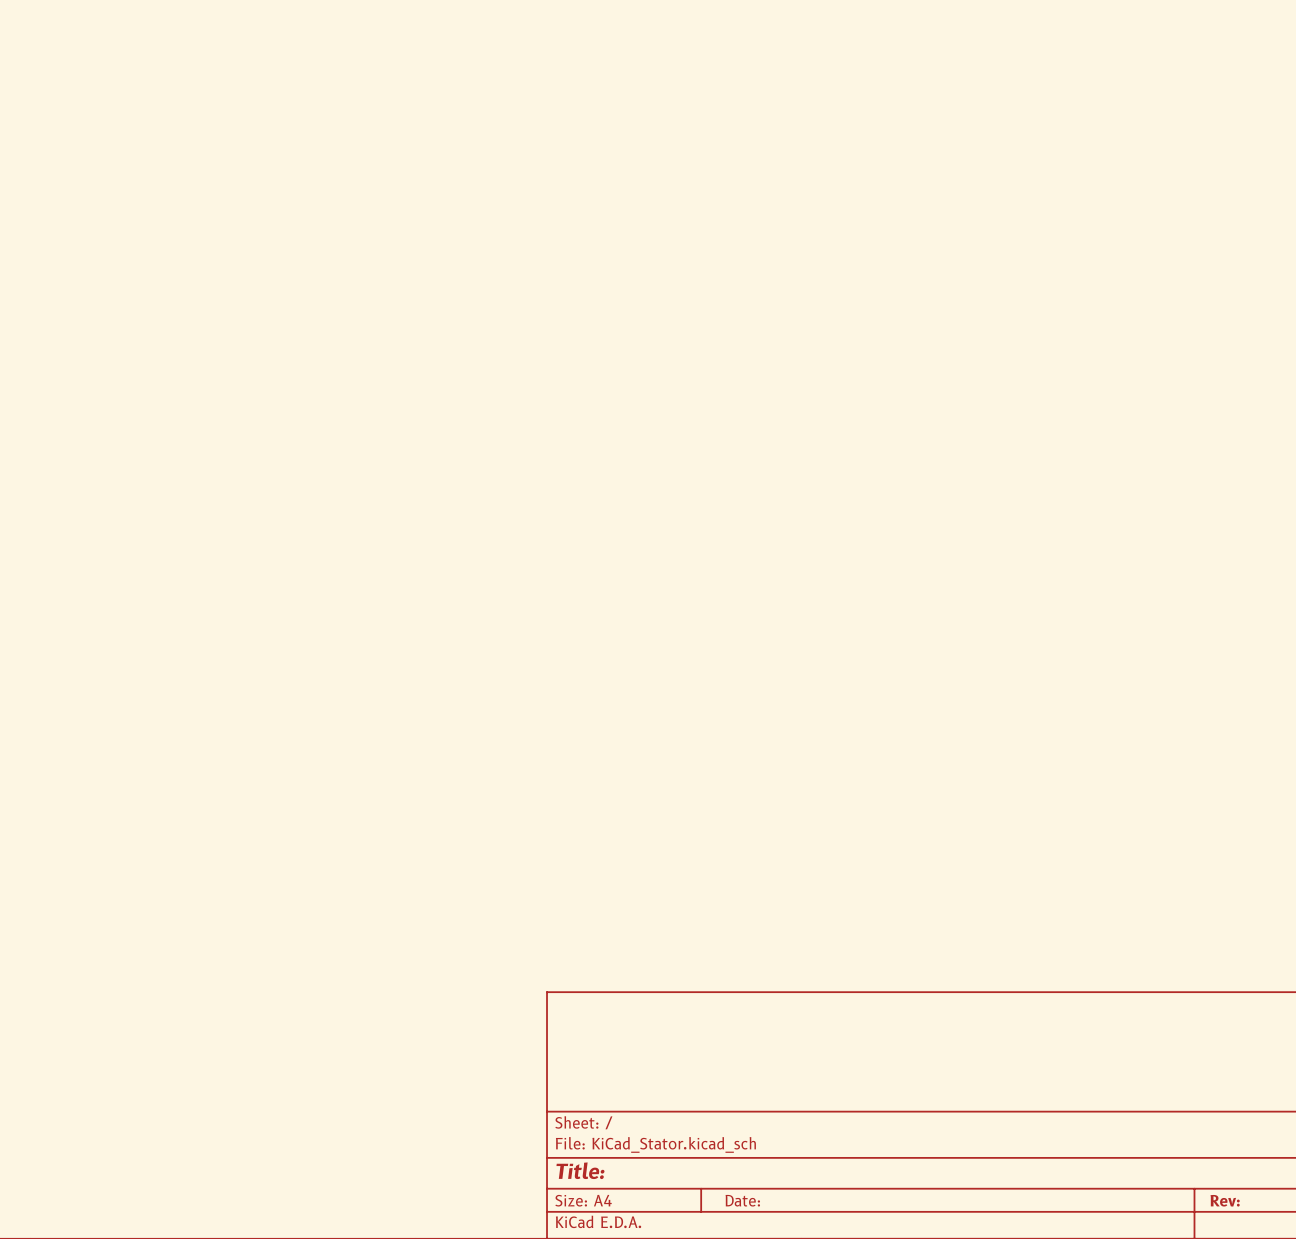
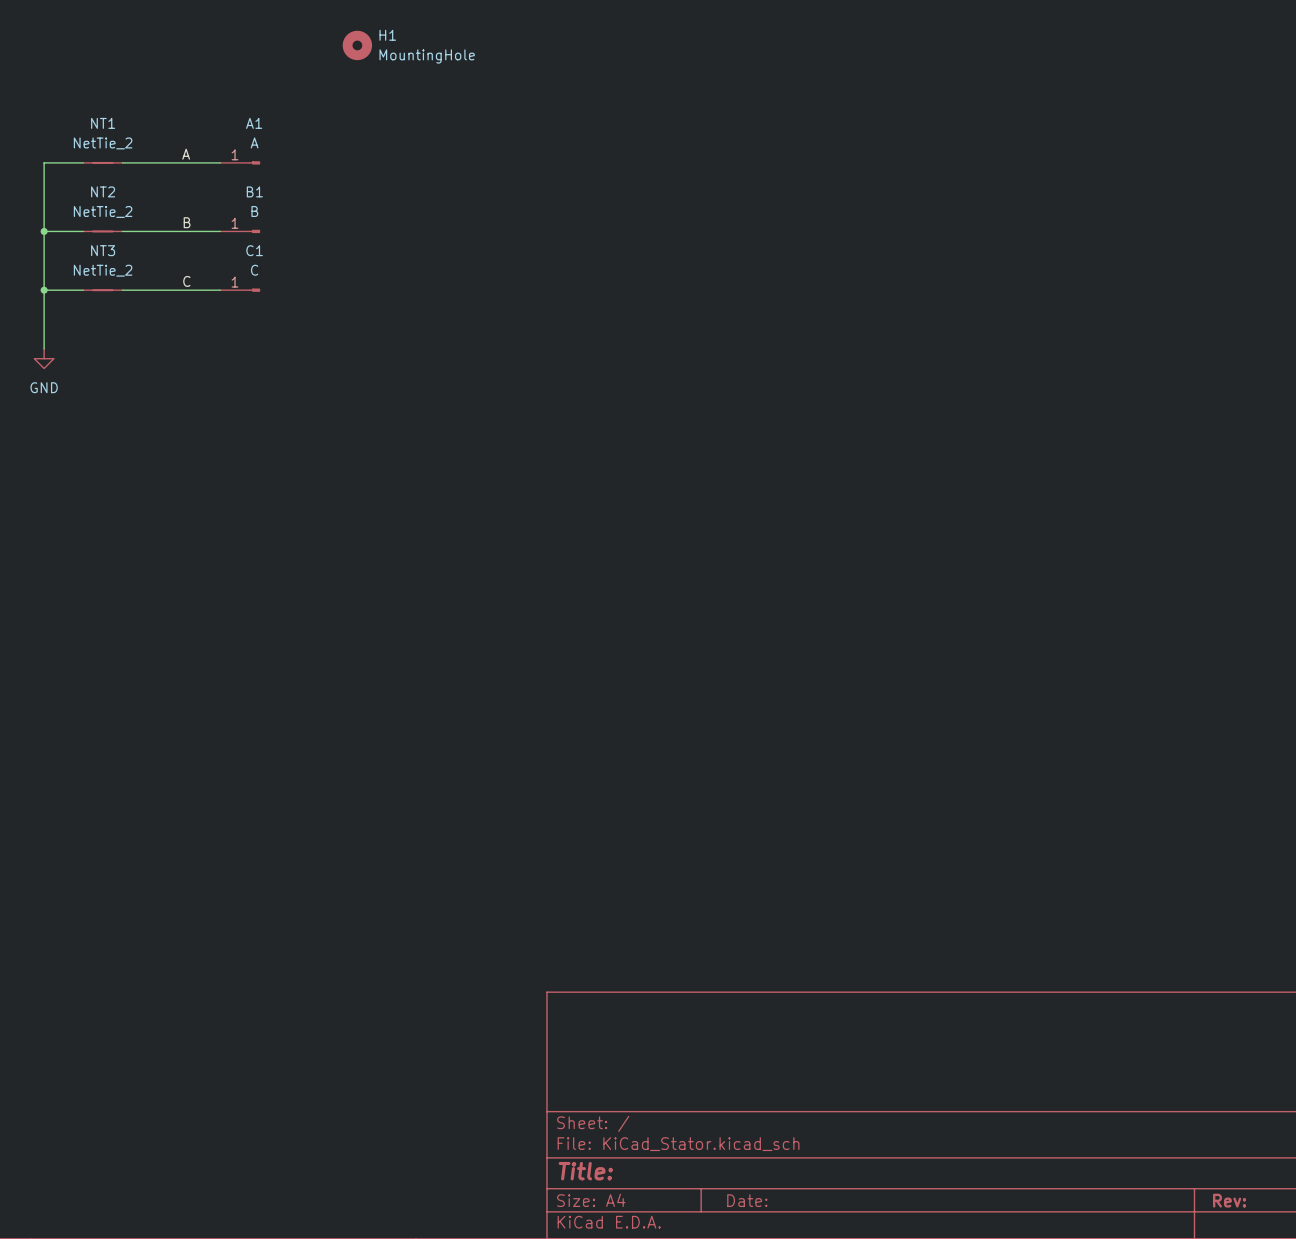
H1: none -> MountingHole (357, 45)
label: none -> A (186, 154)
wire: none -> (83, 162) (44, 162) (44, 348)
NT1: none -> NetTie_2 (102, 162)
wire: none -> (122, 162) (220, 162)
A1: none -> A (240, 162)
label: none -> B (187, 222)
wire: none -> (44, 231) (83, 231)
junction: none -> (44, 231)
NT2: none -> NetTie_2 (102, 231)
wire: none -> (122, 231) (220, 231)
B1: none -> B (240, 231)
label: none -> C (186, 281)
wire: none -> (44, 290) (83, 290)
junction: none -> (44, 290)
NT3: none -> NetTie_2 (102, 290)
wire: none -> (122, 290) (220, 290)
C1: none -> C (240, 290)
power symbol: none -> GND (44, 358)

